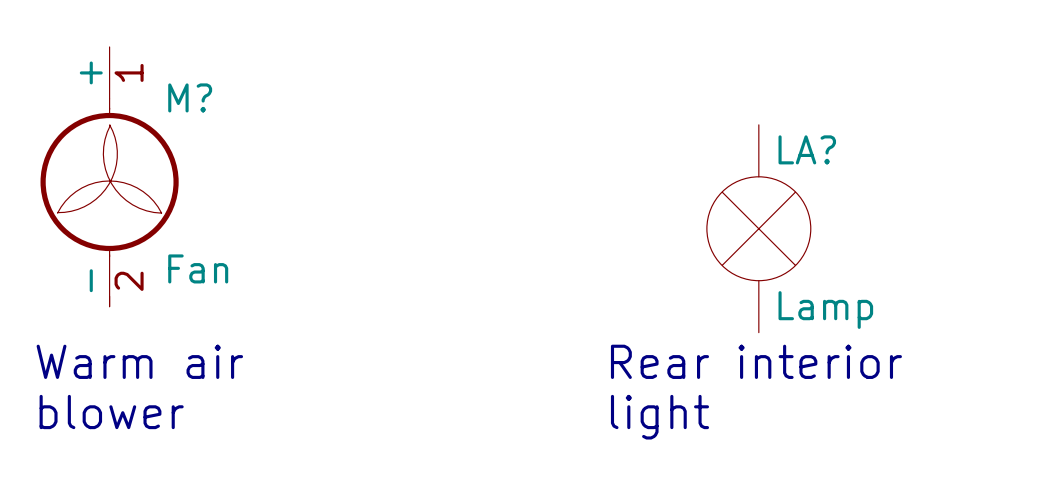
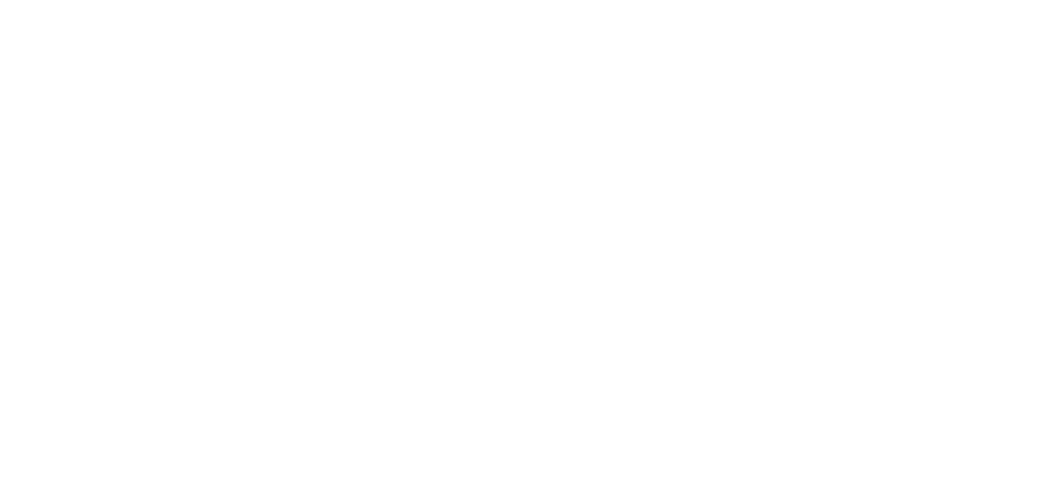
M?: Fan (109, 176) -> none
LA?: Lamp (758, 228) -> none
text: Warm air (139, 361) -> none
text: Rear interior (756, 361) -> none
text: blower (111, 412) -> none
text: light (659, 417) -> none

